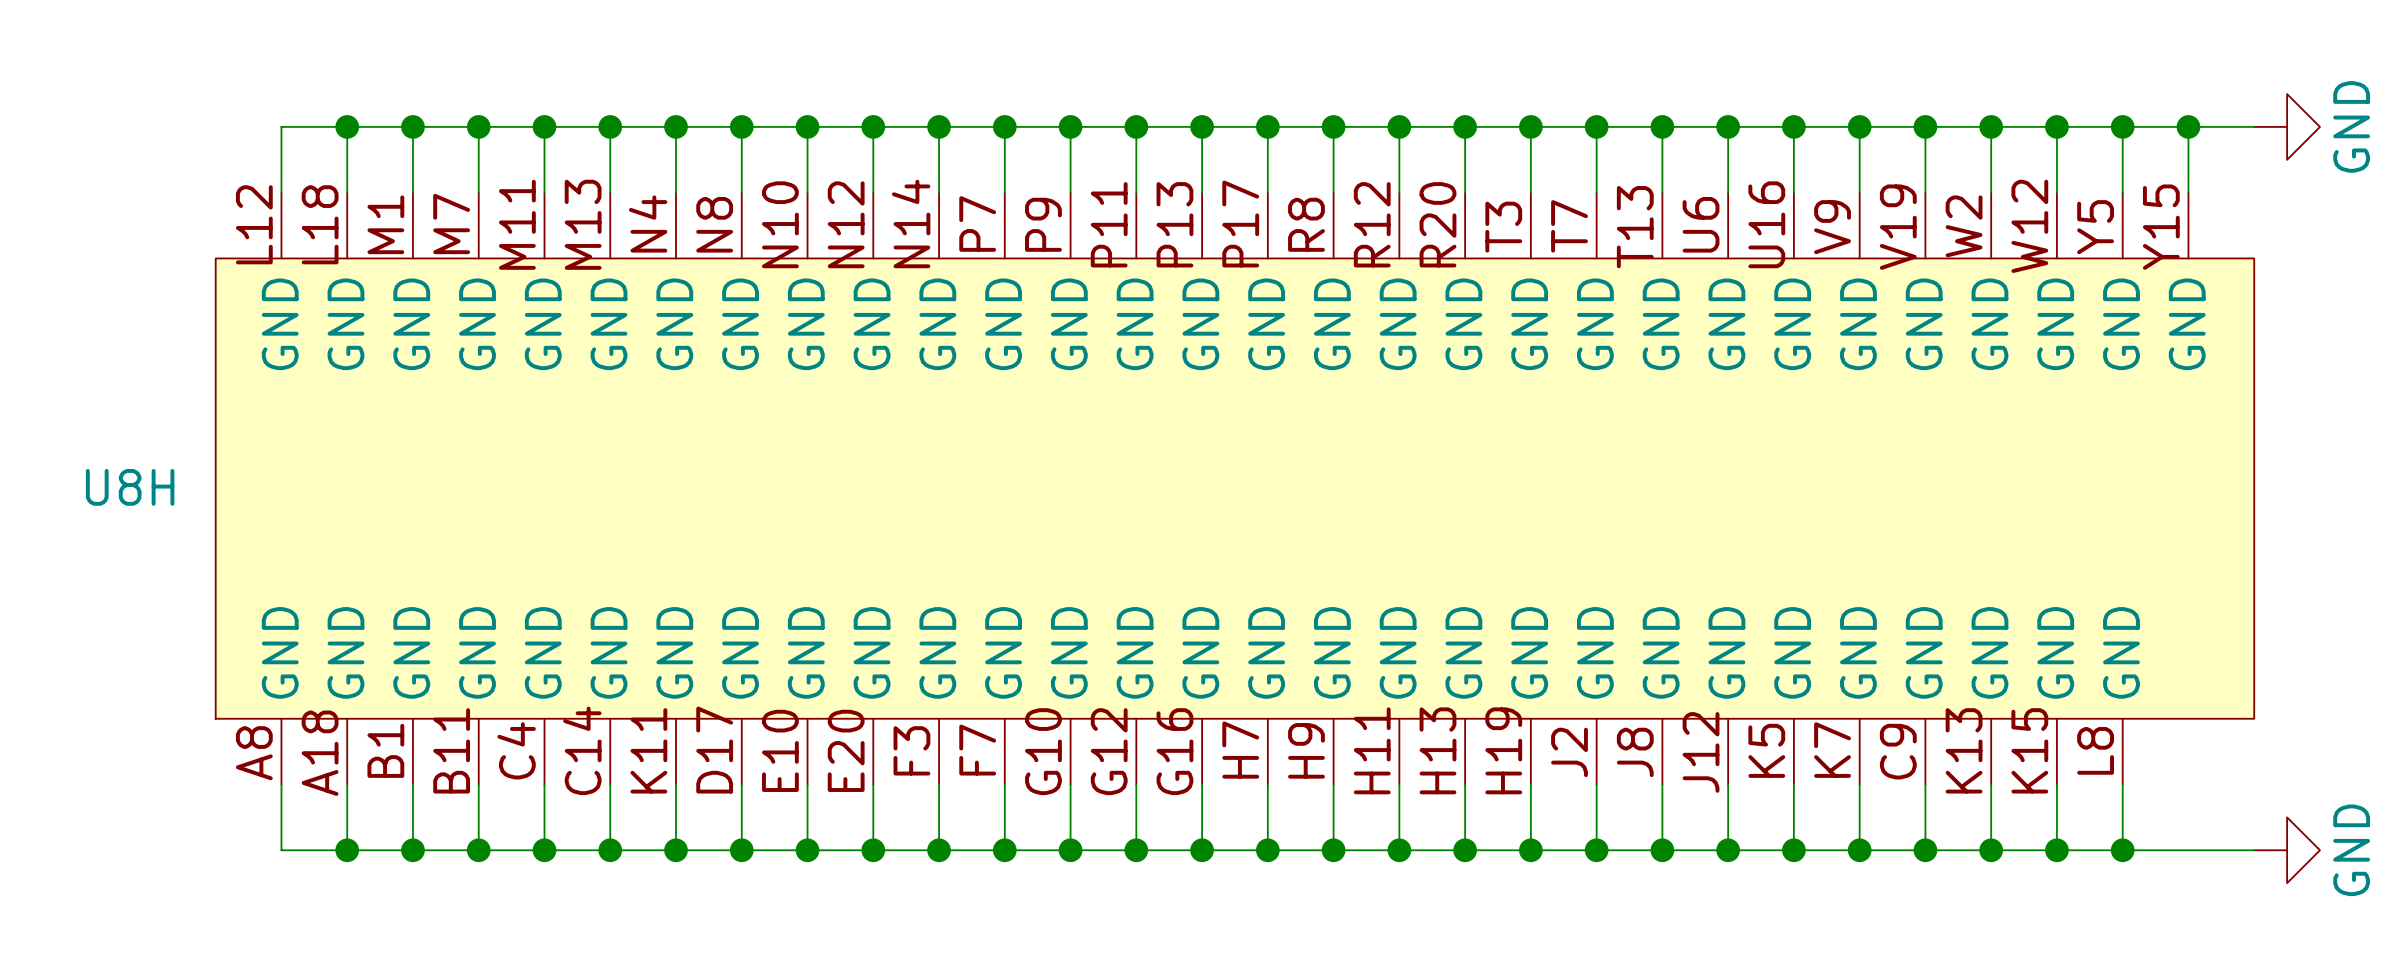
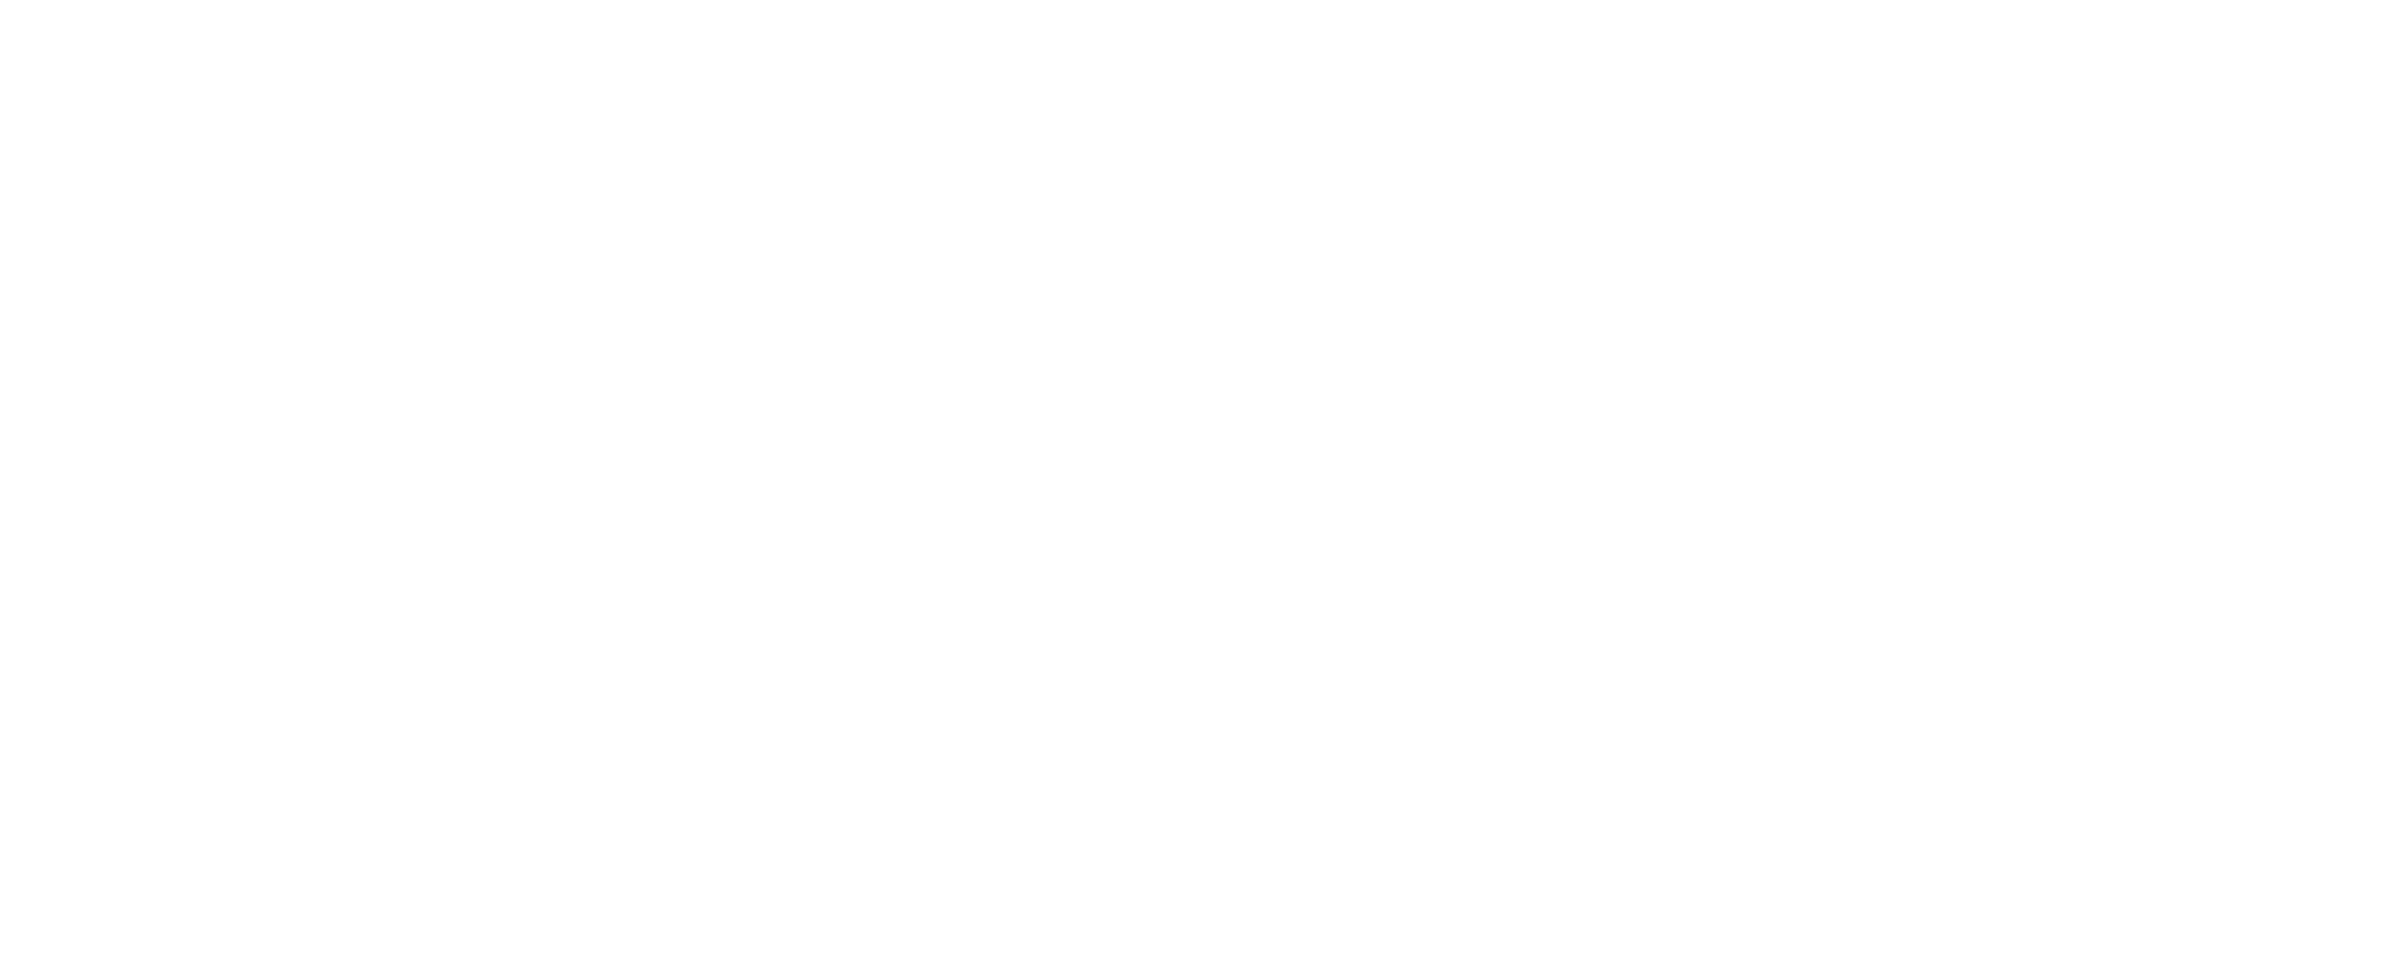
wire: (347, 126) (347, 192) -> none
junction: (347, 126) -> none
wire: (412, 126) (412, 192) -> none
junction: (412, 126) -> none
wire: (478, 126) (478, 192) -> none
junction: (478, 126) -> none
wire: (544, 126) (544, 192) -> none
junction: (544, 126) -> none
wire: (610, 126) (610, 192) -> none
junction: (610, 126) -> none
wire: (676, 126) (676, 192) -> none
junction: (676, 126) -> none
wire: (741, 126) (741, 192) -> none
junction: (741, 126) -> none
wire: (807, 126) (807, 192) -> none
junction: (807, 126) -> none
wire: (873, 126) (873, 192) -> none
junction: (873, 126) -> none
wire: (939, 126) (939, 192) -> none
junction: (939, 126) -> none
wire: (1004, 126) (1004, 192) -> none
junction: (1004, 126) -> none
wire: (1070, 126) (1070, 192) -> none
junction: (1070, 126) -> none
wire: (1136, 126) (1136, 192) -> none
junction: (1136, 126) -> none
wire: (1202, 126) (1202, 192) -> none
junction: (1202, 126) -> none
wire: (1267, 126) (1267, 192) -> none
junction: (1267, 126) -> none
wire: (1333, 126) (1333, 192) -> none
junction: (1333, 126) -> none
wire: (1399, 126) (1399, 192) -> none
junction: (1399, 126) -> none
wire: (1465, 126) (1465, 192) -> none
junction: (1465, 126) -> none
wire: (1530, 126) (1530, 192) -> none
junction: (1530, 126) -> none
wire: (1596, 126) (1596, 192) -> none
junction: (1596, 126) -> none
wire: (1662, 126) (1662, 192) -> none
junction: (1662, 126) -> none
wire: (1728, 126) (1728, 192) -> none
junction: (1728, 126) -> none
wire: (1793, 126) (1793, 192) -> none
junction: (1793, 126) -> none
wire: (1859, 126) (1859, 192) -> none
junction: (1859, 126) -> none
wire: (1925, 126) (1925, 192) -> none
junction: (1925, 126) -> none
wire: (1991, 126) (1991, 192) -> none
junction: (1991, 126) -> none
wire: (2056, 126) (2056, 192) -> none
junction: (2056, 126) -> none
wire: (2122, 126) (2122, 192) -> none
junction: (2122, 126) -> none
wire: (2188, 126) (2188, 192) -> none
junction: (2188, 126) -> none
wire: (2254, 126) (281, 126) (281, 192) -> none
power symbol: GND (2287, 126) -> none
U8H: (1234, 488) -> none
wire: (281, 784) (281, 850) (2254, 850) -> none
wire: (347, 784) (347, 850) -> none
wire: (412, 784) (412, 850) -> none
wire: (478, 784) (478, 850) -> none
wire: (544, 784) (544, 850) -> none
wire: (610, 784) (610, 850) -> none
wire: (676, 784) (676, 850) -> none
wire: (741, 784) (741, 850) -> none
wire: (807, 784) (807, 850) -> none
wire: (873, 784) (873, 850) -> none
wire: (939, 784) (939, 850) -> none
wire: (1004, 784) (1004, 850) -> none
wire: (1070, 784) (1070, 850) -> none
wire: (1136, 784) (1136, 850) -> none
wire: (1202, 784) (1202, 850) -> none
wire: (1267, 784) (1267, 850) -> none
wire: (1333, 784) (1333, 850) -> none
wire: (1399, 784) (1399, 850) -> none
wire: (1465, 784) (1465, 850) -> none
wire: (1530, 784) (1530, 850) -> none
wire: (1596, 784) (1596, 850) -> none
wire: (1662, 784) (1662, 850) -> none
wire: (1728, 784) (1728, 850) -> none
wire: (1793, 784) (1793, 850) -> none
wire: (1859, 784) (1859, 850) -> none
wire: (1925, 784) (1925, 850) -> none
wire: (1991, 784) (1991, 850) -> none
wire: (2056, 784) (2056, 850) -> none
wire: (2122, 784) (2122, 850) -> none
junction: (347, 850) -> none
junction: (412, 850) -> none
junction: (478, 850) -> none
junction: (544, 850) -> none
junction: (610, 850) -> none
junction: (676, 850) -> none
junction: (741, 850) -> none
junction: (807, 850) -> none
junction: (873, 850) -> none
junction: (939, 850) -> none
junction: (1004, 850) -> none
junction: (1070, 850) -> none
junction: (1136, 850) -> none
junction: (1202, 850) -> none
junction: (1267, 850) -> none
junction: (1333, 850) -> none
junction: (1399, 850) -> none
junction: (1465, 850) -> none
junction: (1530, 850) -> none
junction: (1596, 850) -> none
junction: (1662, 850) -> none
junction: (1728, 850) -> none
junction: (1793, 850) -> none
junction: (1859, 850) -> none
junction: (1925, 850) -> none
junction: (1991, 850) -> none
junction: (2056, 850) -> none
junction: (2122, 850) -> none
power symbol: GND (2287, 850) -> none

